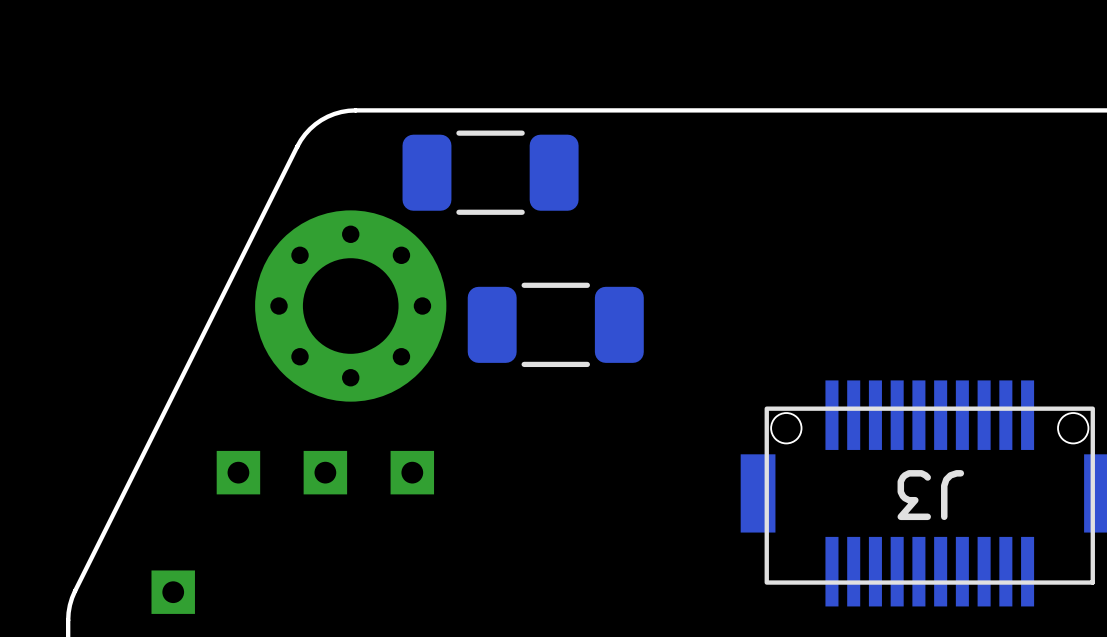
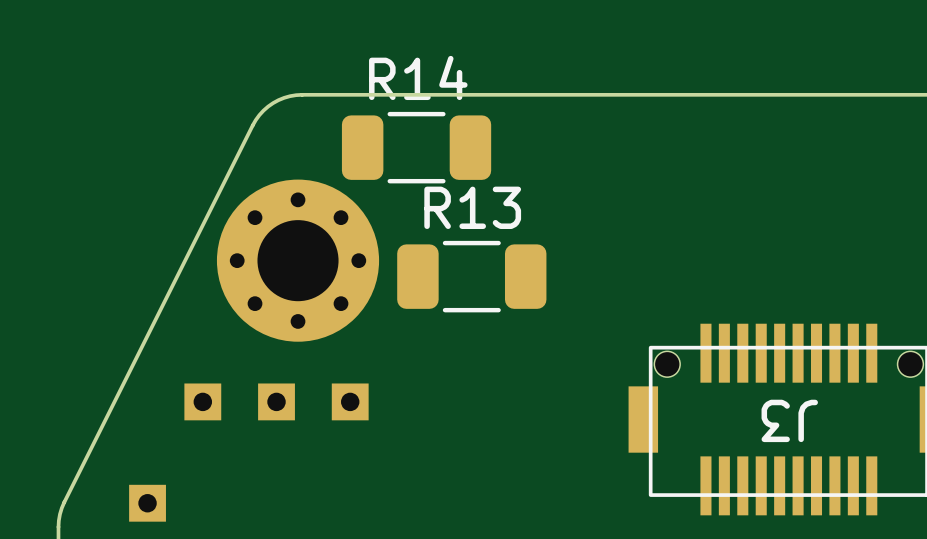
R14 name: none -> R14 (418, 77)
R13 name: none -> R13 (472, 207)

